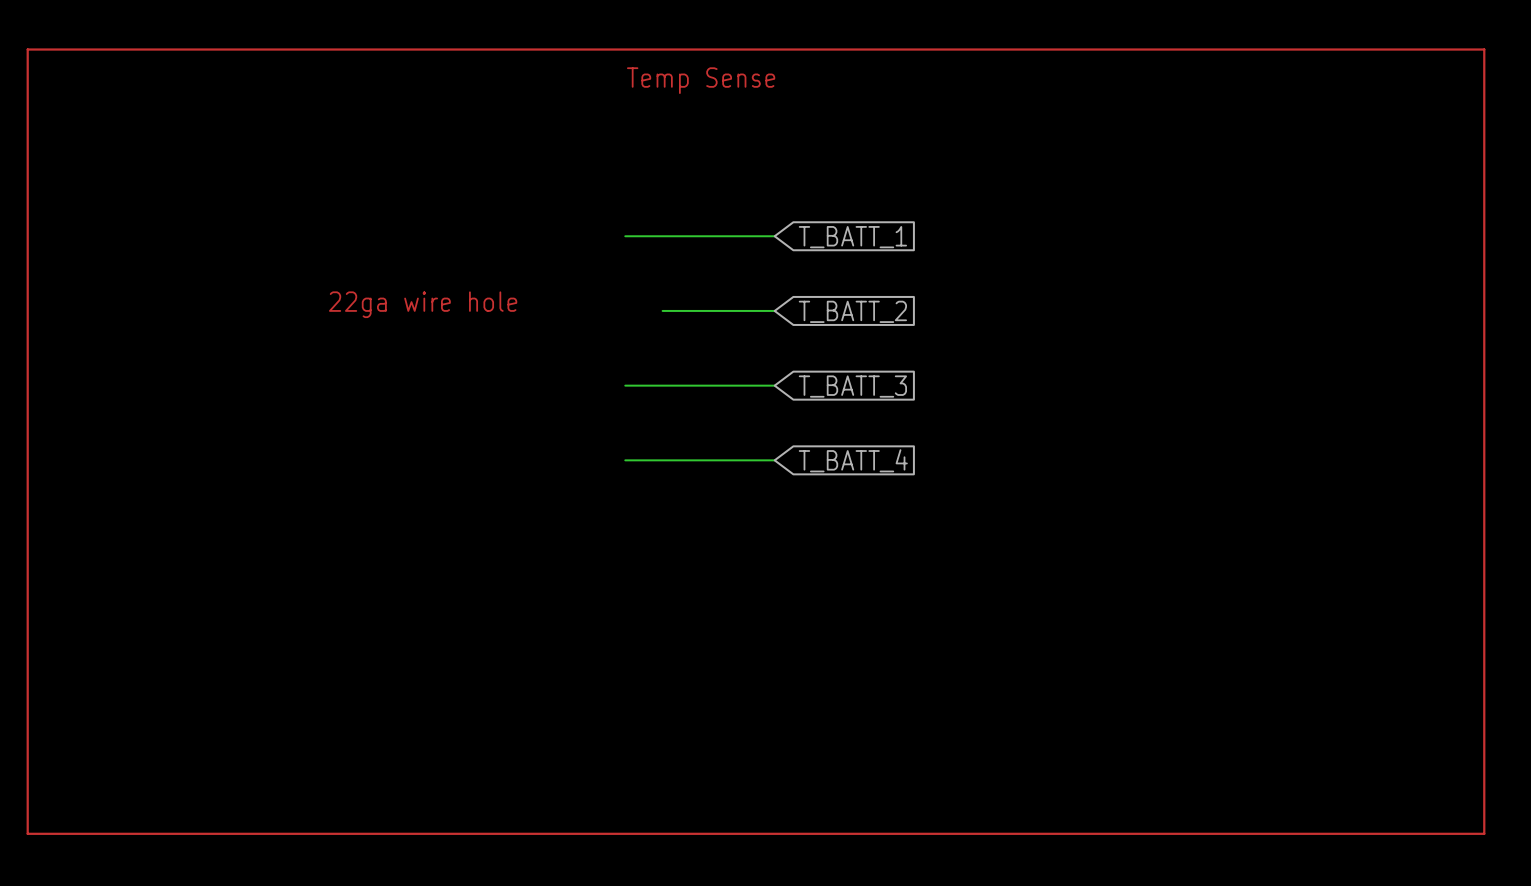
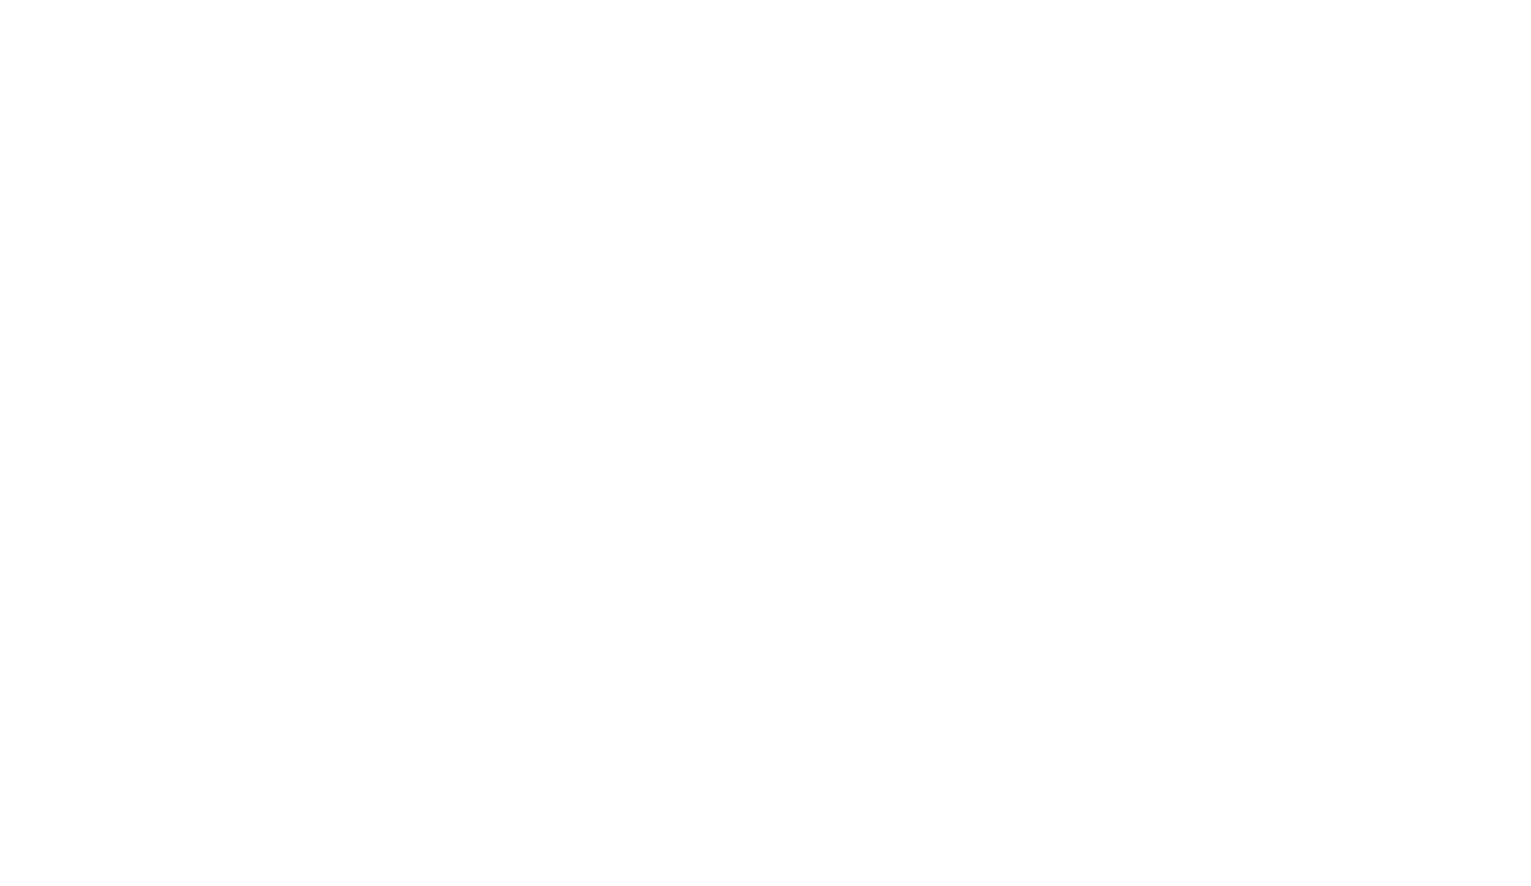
line: (27, 49) (1484, 49) (1484, 833) (27, 833) (27, 49) -> none
text: Temp Sense (701, 80) -> none
wire: (625, 236) (774, 236) -> none
global label: T_BATT_1 (852, 237) -> none
text: 22ga wire hole (423, 304) -> none
wire: (662, 310) (774, 310) -> none
global label: T_BATT_2 (852, 311) -> none
wire: (625, 385) (774, 385) -> none
global label: T_BATT_3 (852, 386) -> none
wire: (625, 460) (774, 460) -> none
global label: T_BATT_4 (853, 460) -> none

